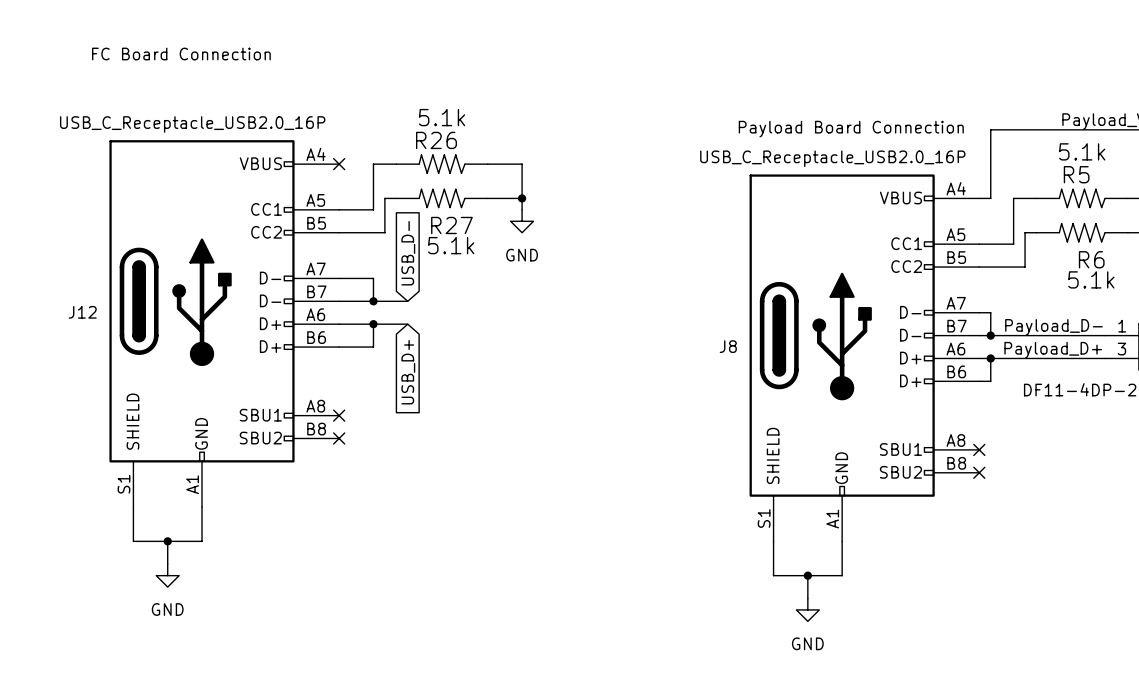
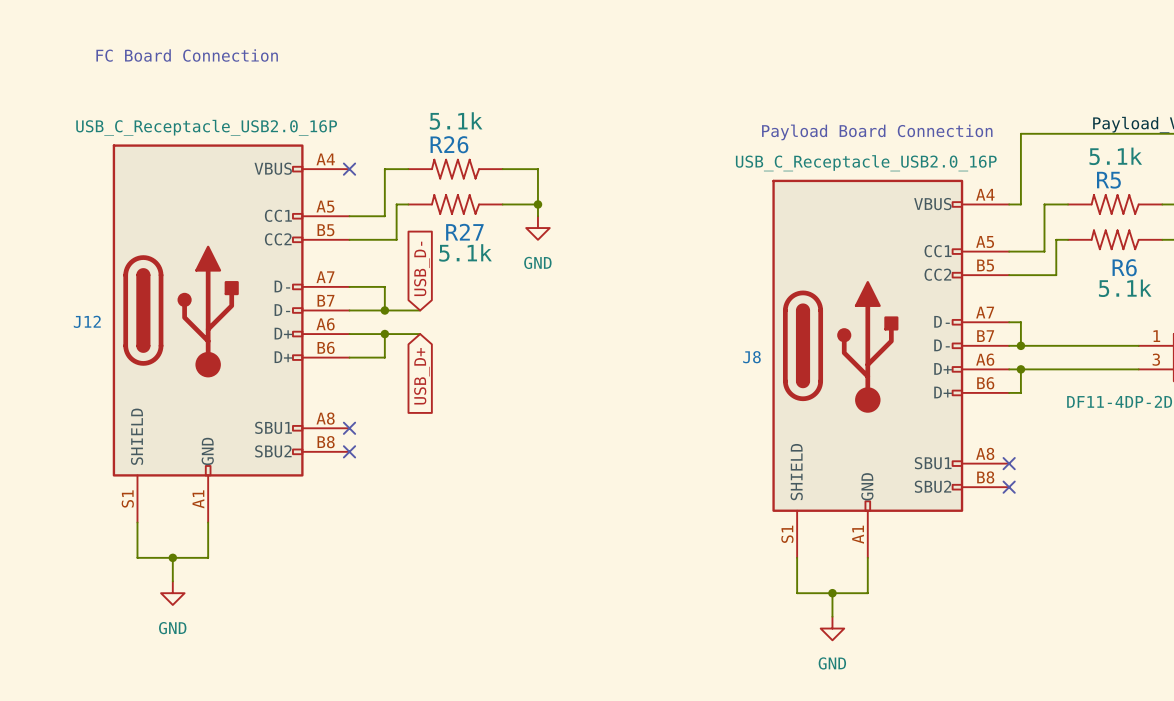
label: Payload_D- (1053, 327) -> none
label: Payload_D+ (1053, 350) -> none

